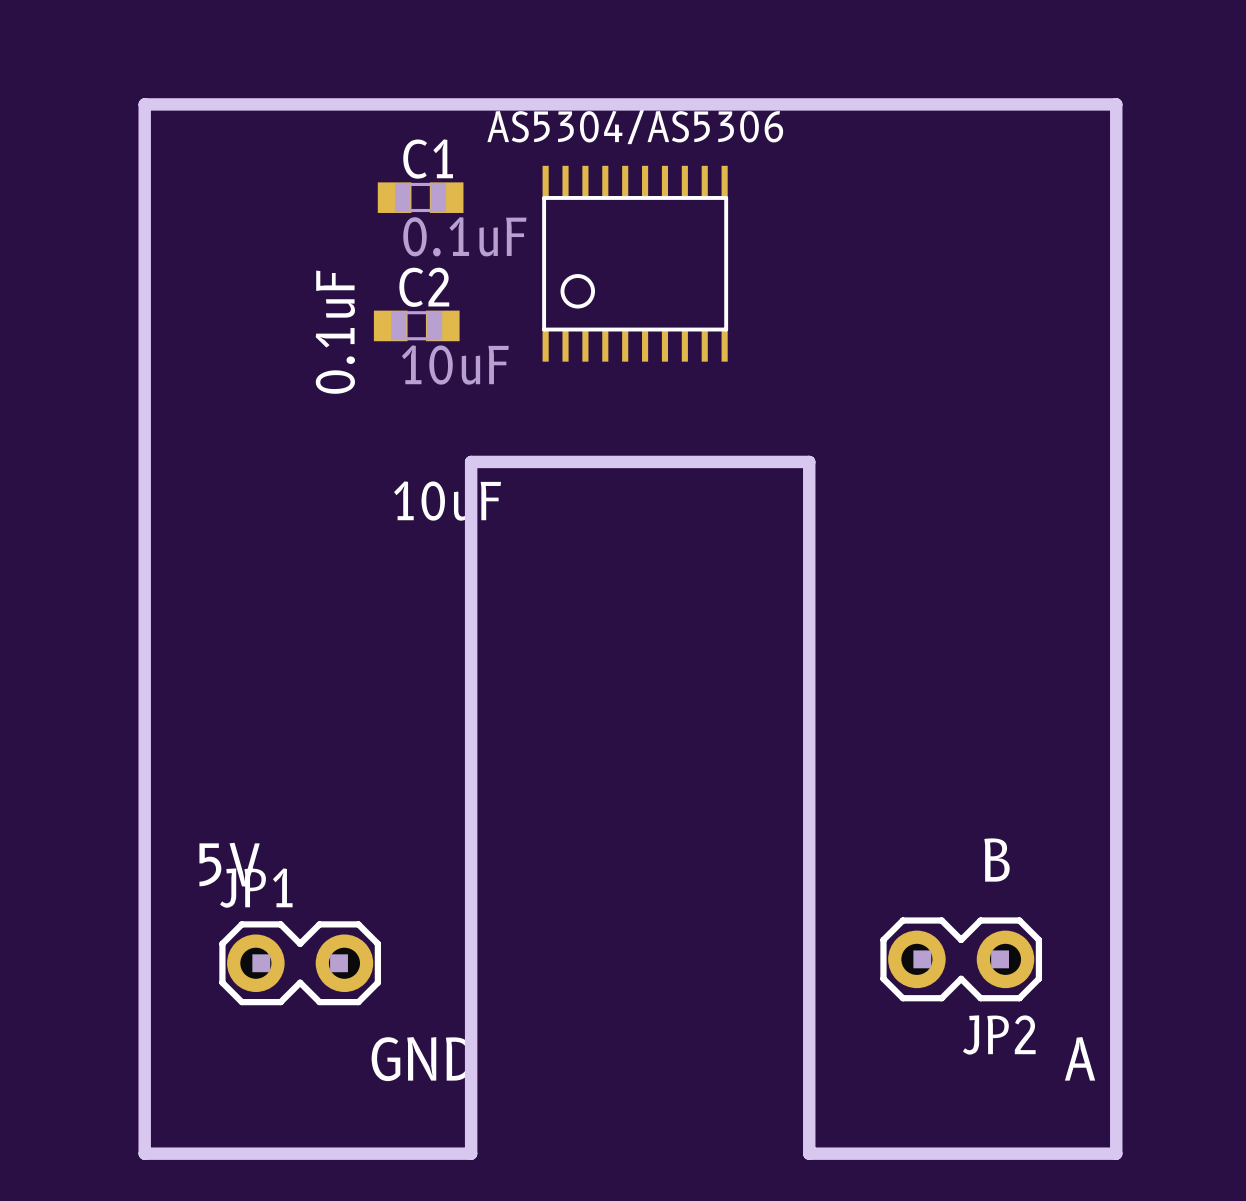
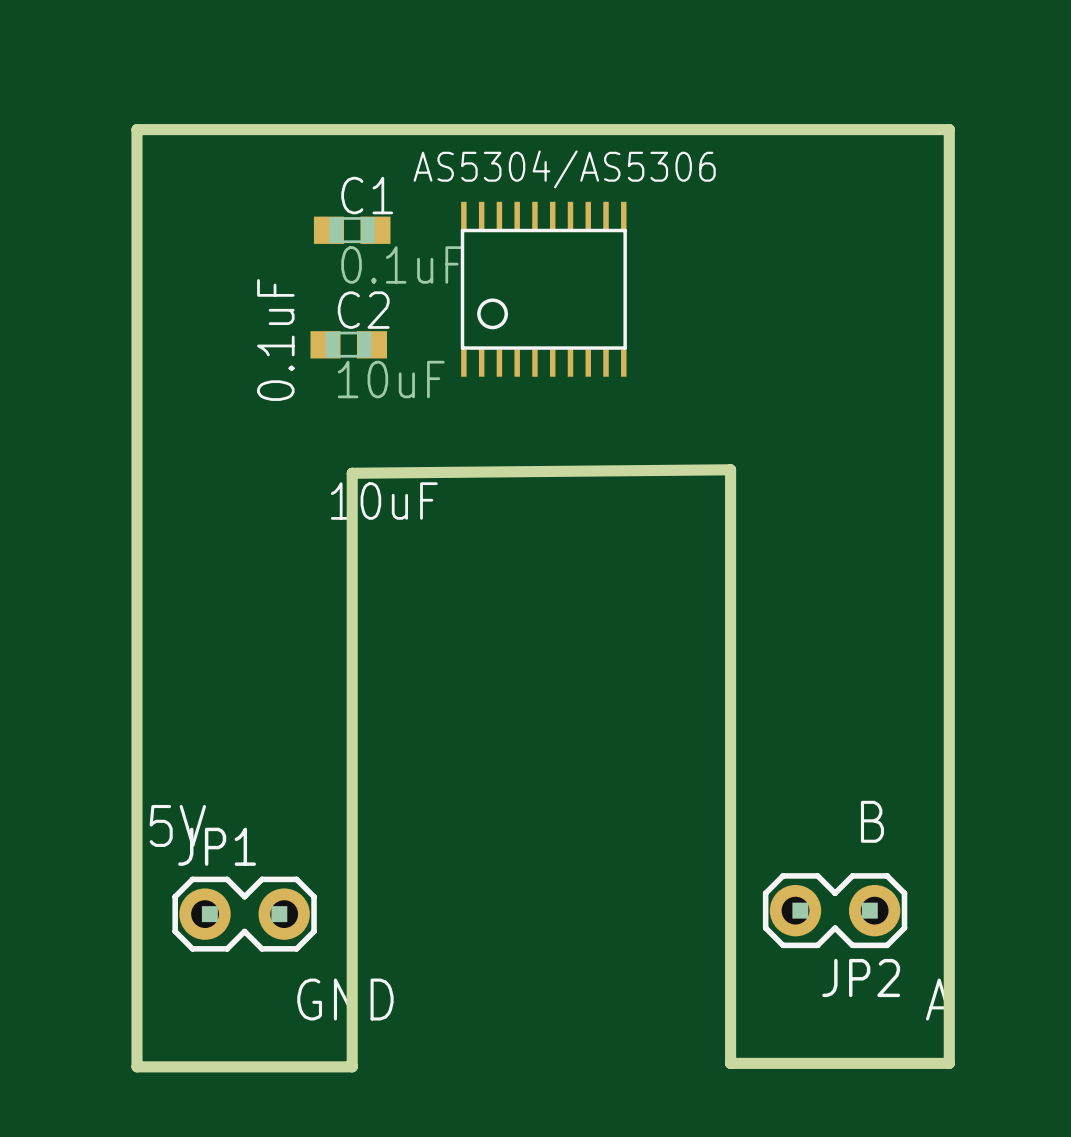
board edge: (144, 104) (1116, 104) (1116, 1153) (809, 1153) (809, 461) (471, 461) (471, 1153) (144, 1153) (144, 104) -> (136, 129) (136, 1066) (352, 1066) (352, 473) (730, 469) (730, 1063) (949, 1063) (949, 129) (136, 129)

